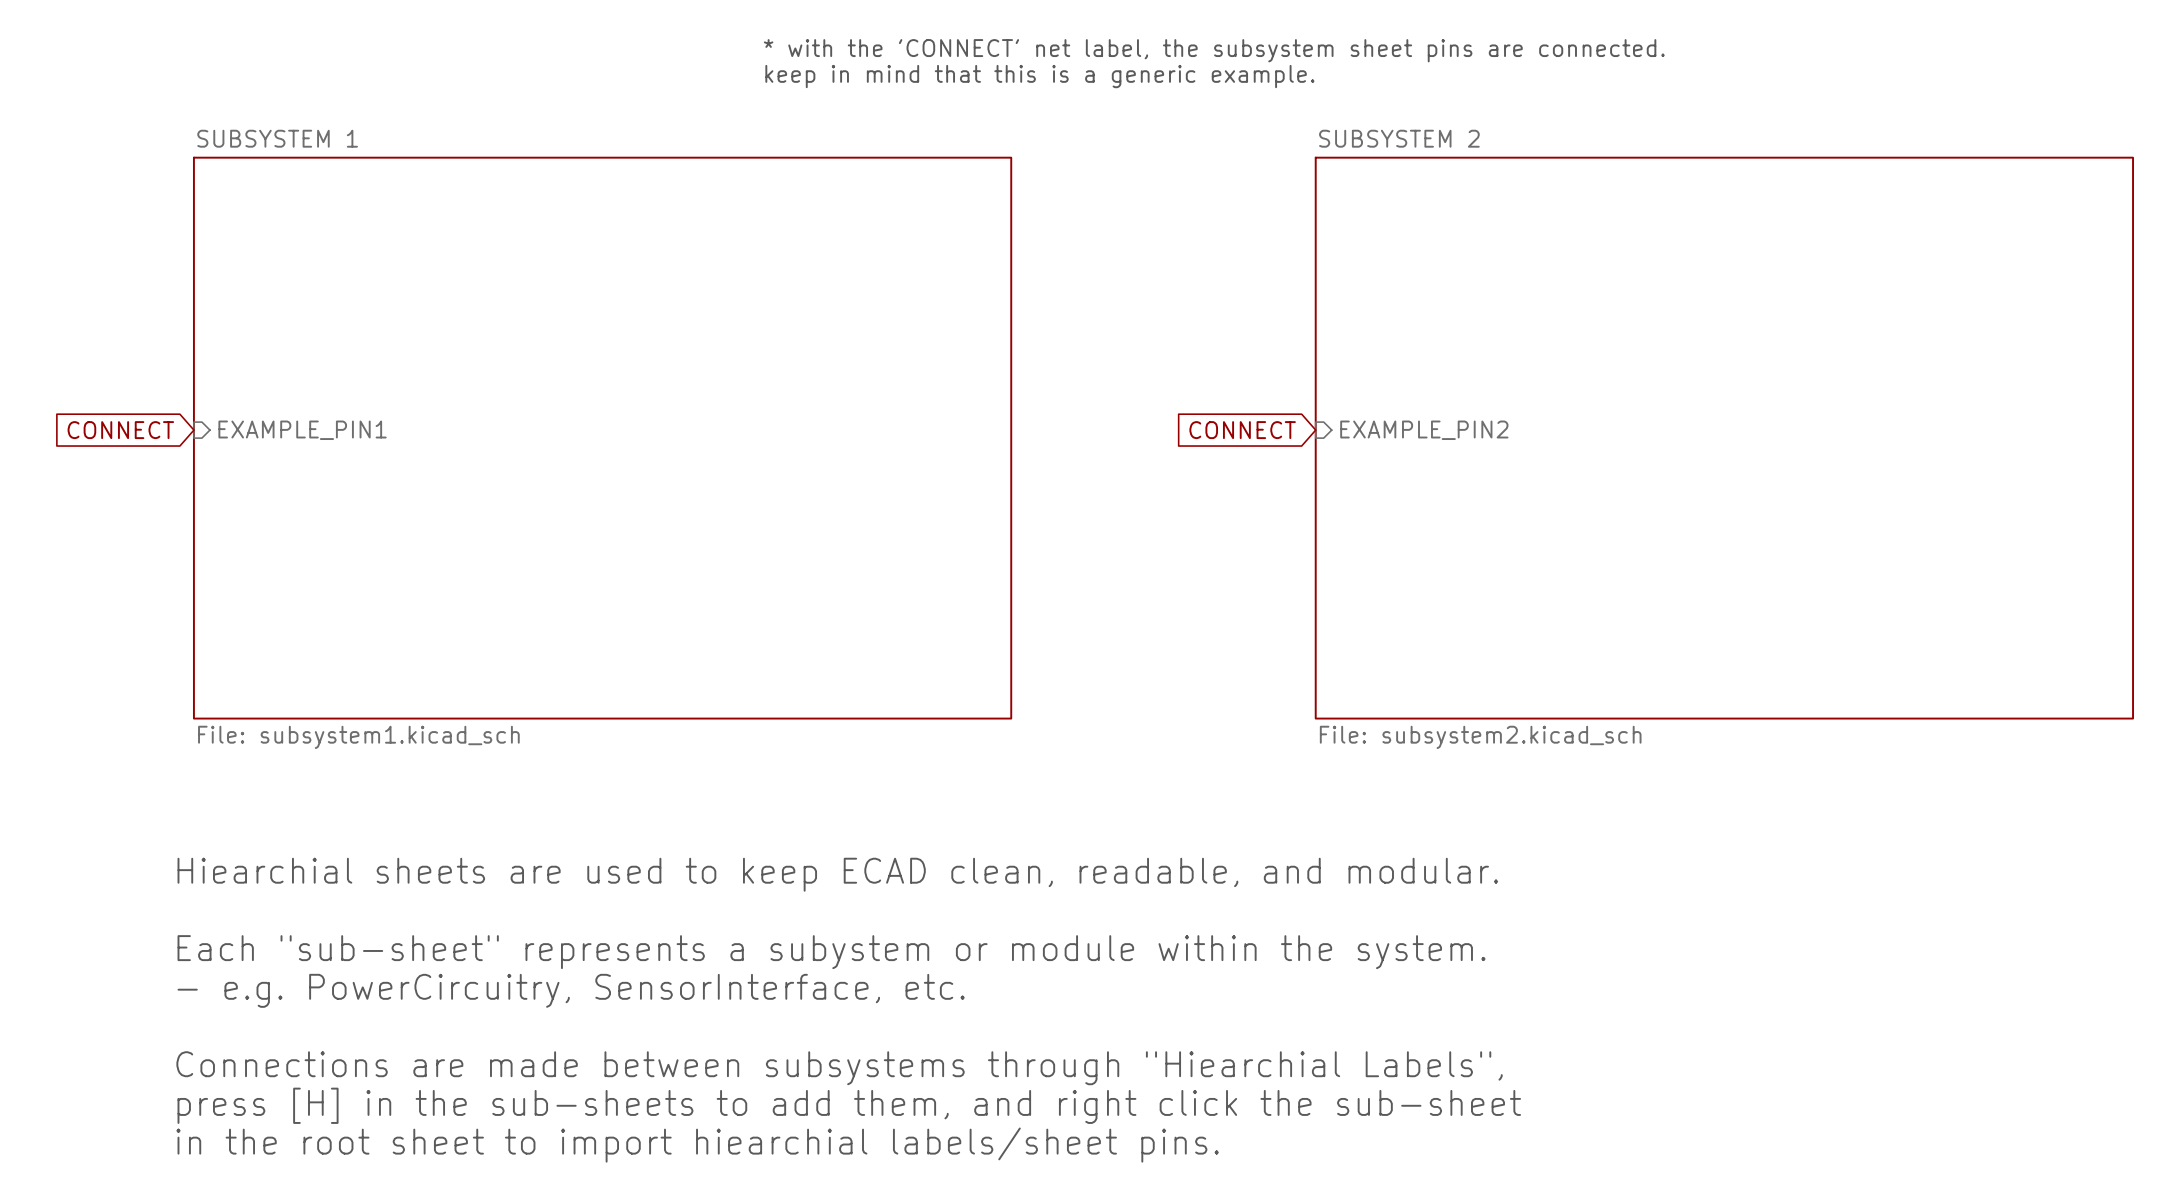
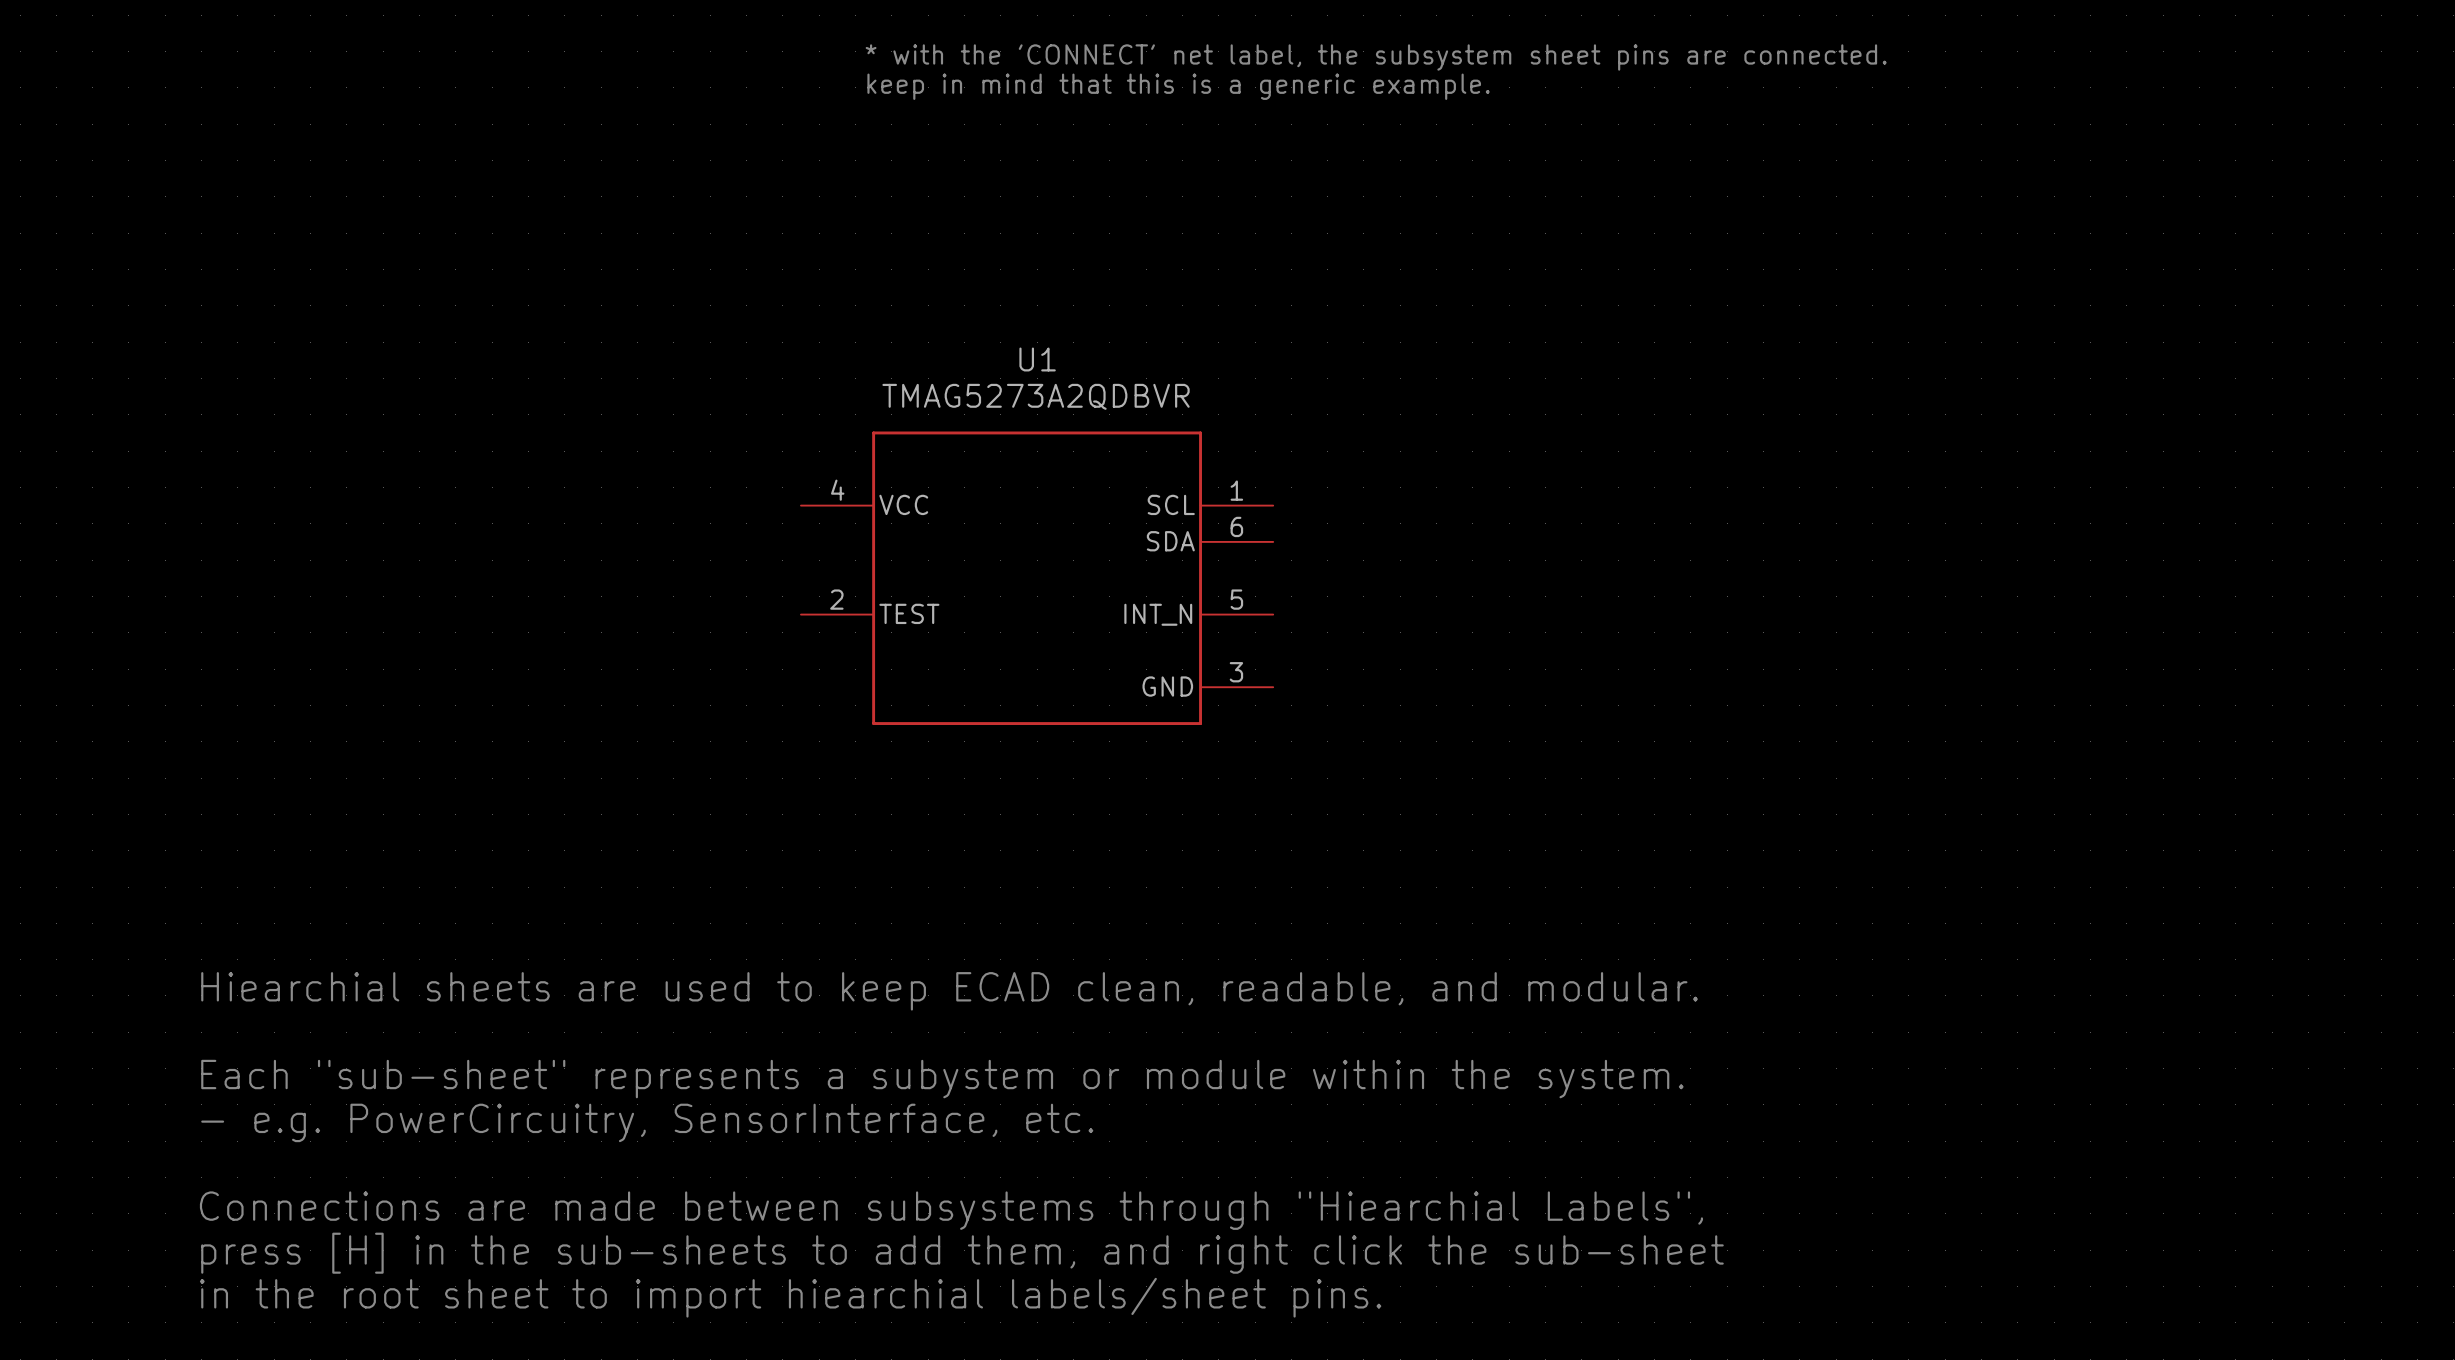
global label: CONNECT (120, 430) -> none
sheet pin: EXAMPLE_PIN1 (302, 430) -> none
global label: CONNECT (1242, 430) -> none
sheet pin: EXAMPLE_PIN2 (1424, 430) -> none
sheet SUBSYSTEM 1: File: subsystem1.kicad_sch (602, 438) -> none
sheet SUBSYSTEM 2: File: subsystem2.kicad_sch (1724, 438) -> none
U1: none -> TMAG5273A2QDBVR (1037, 578)

